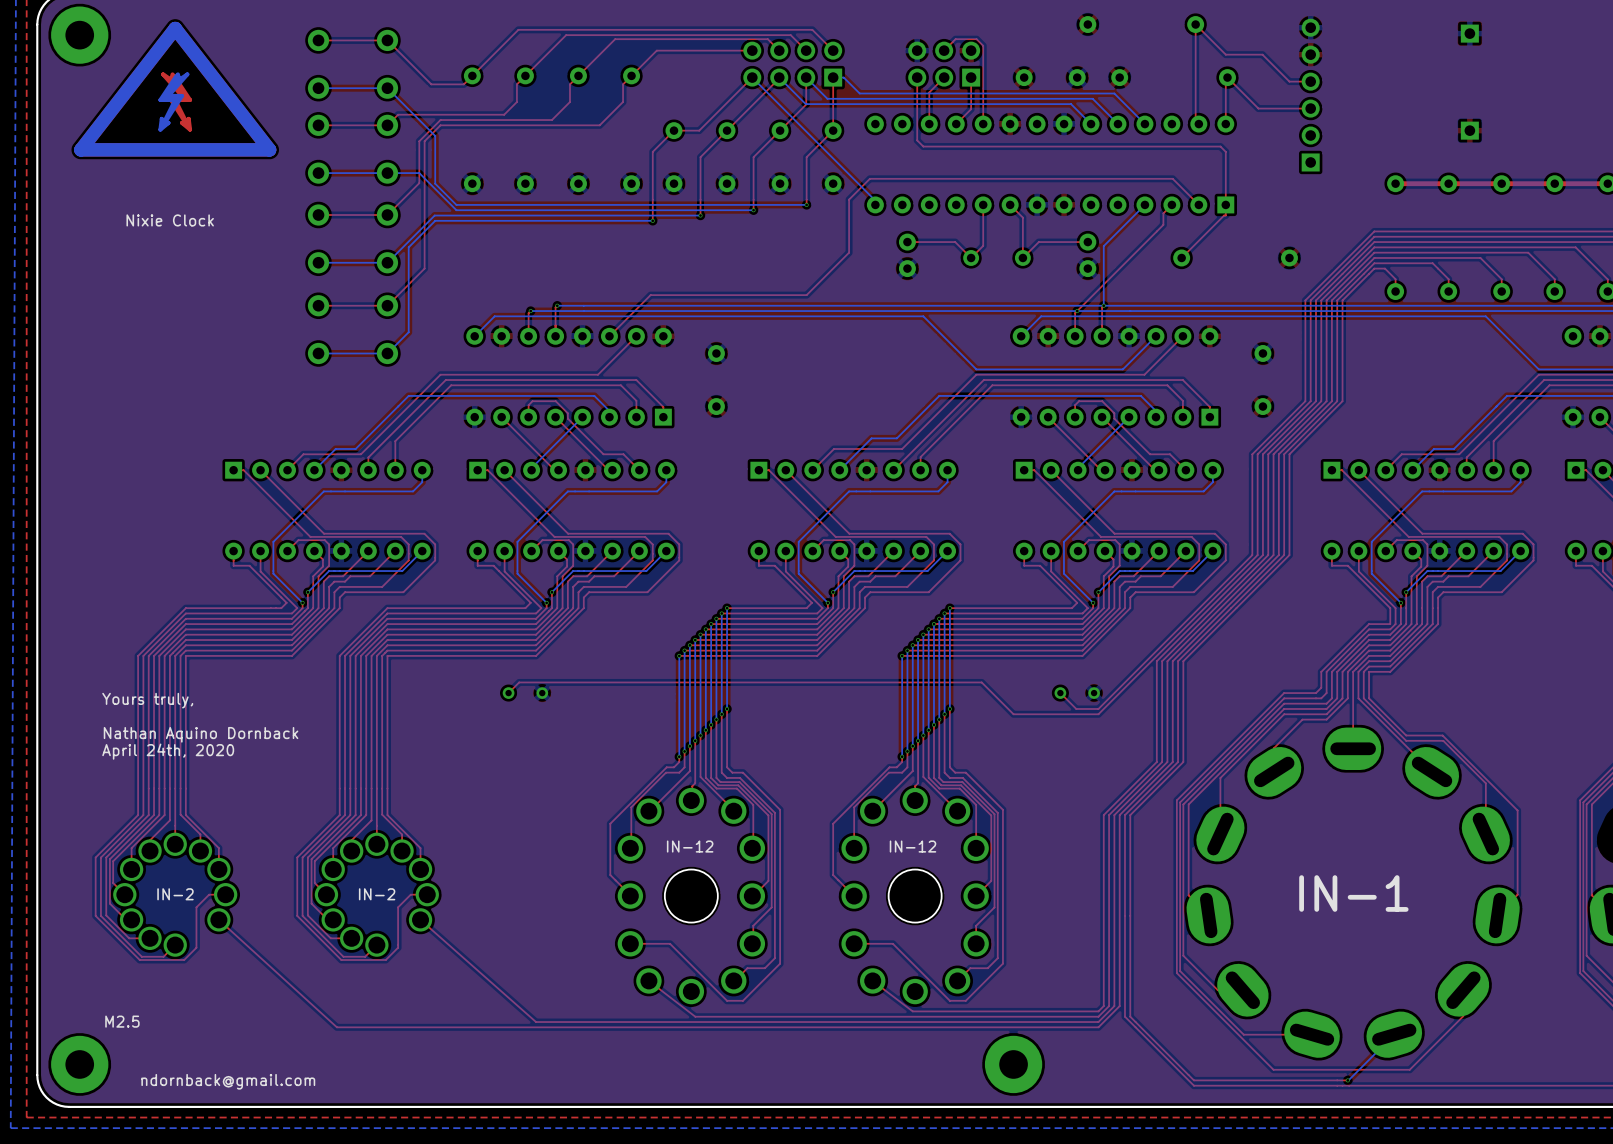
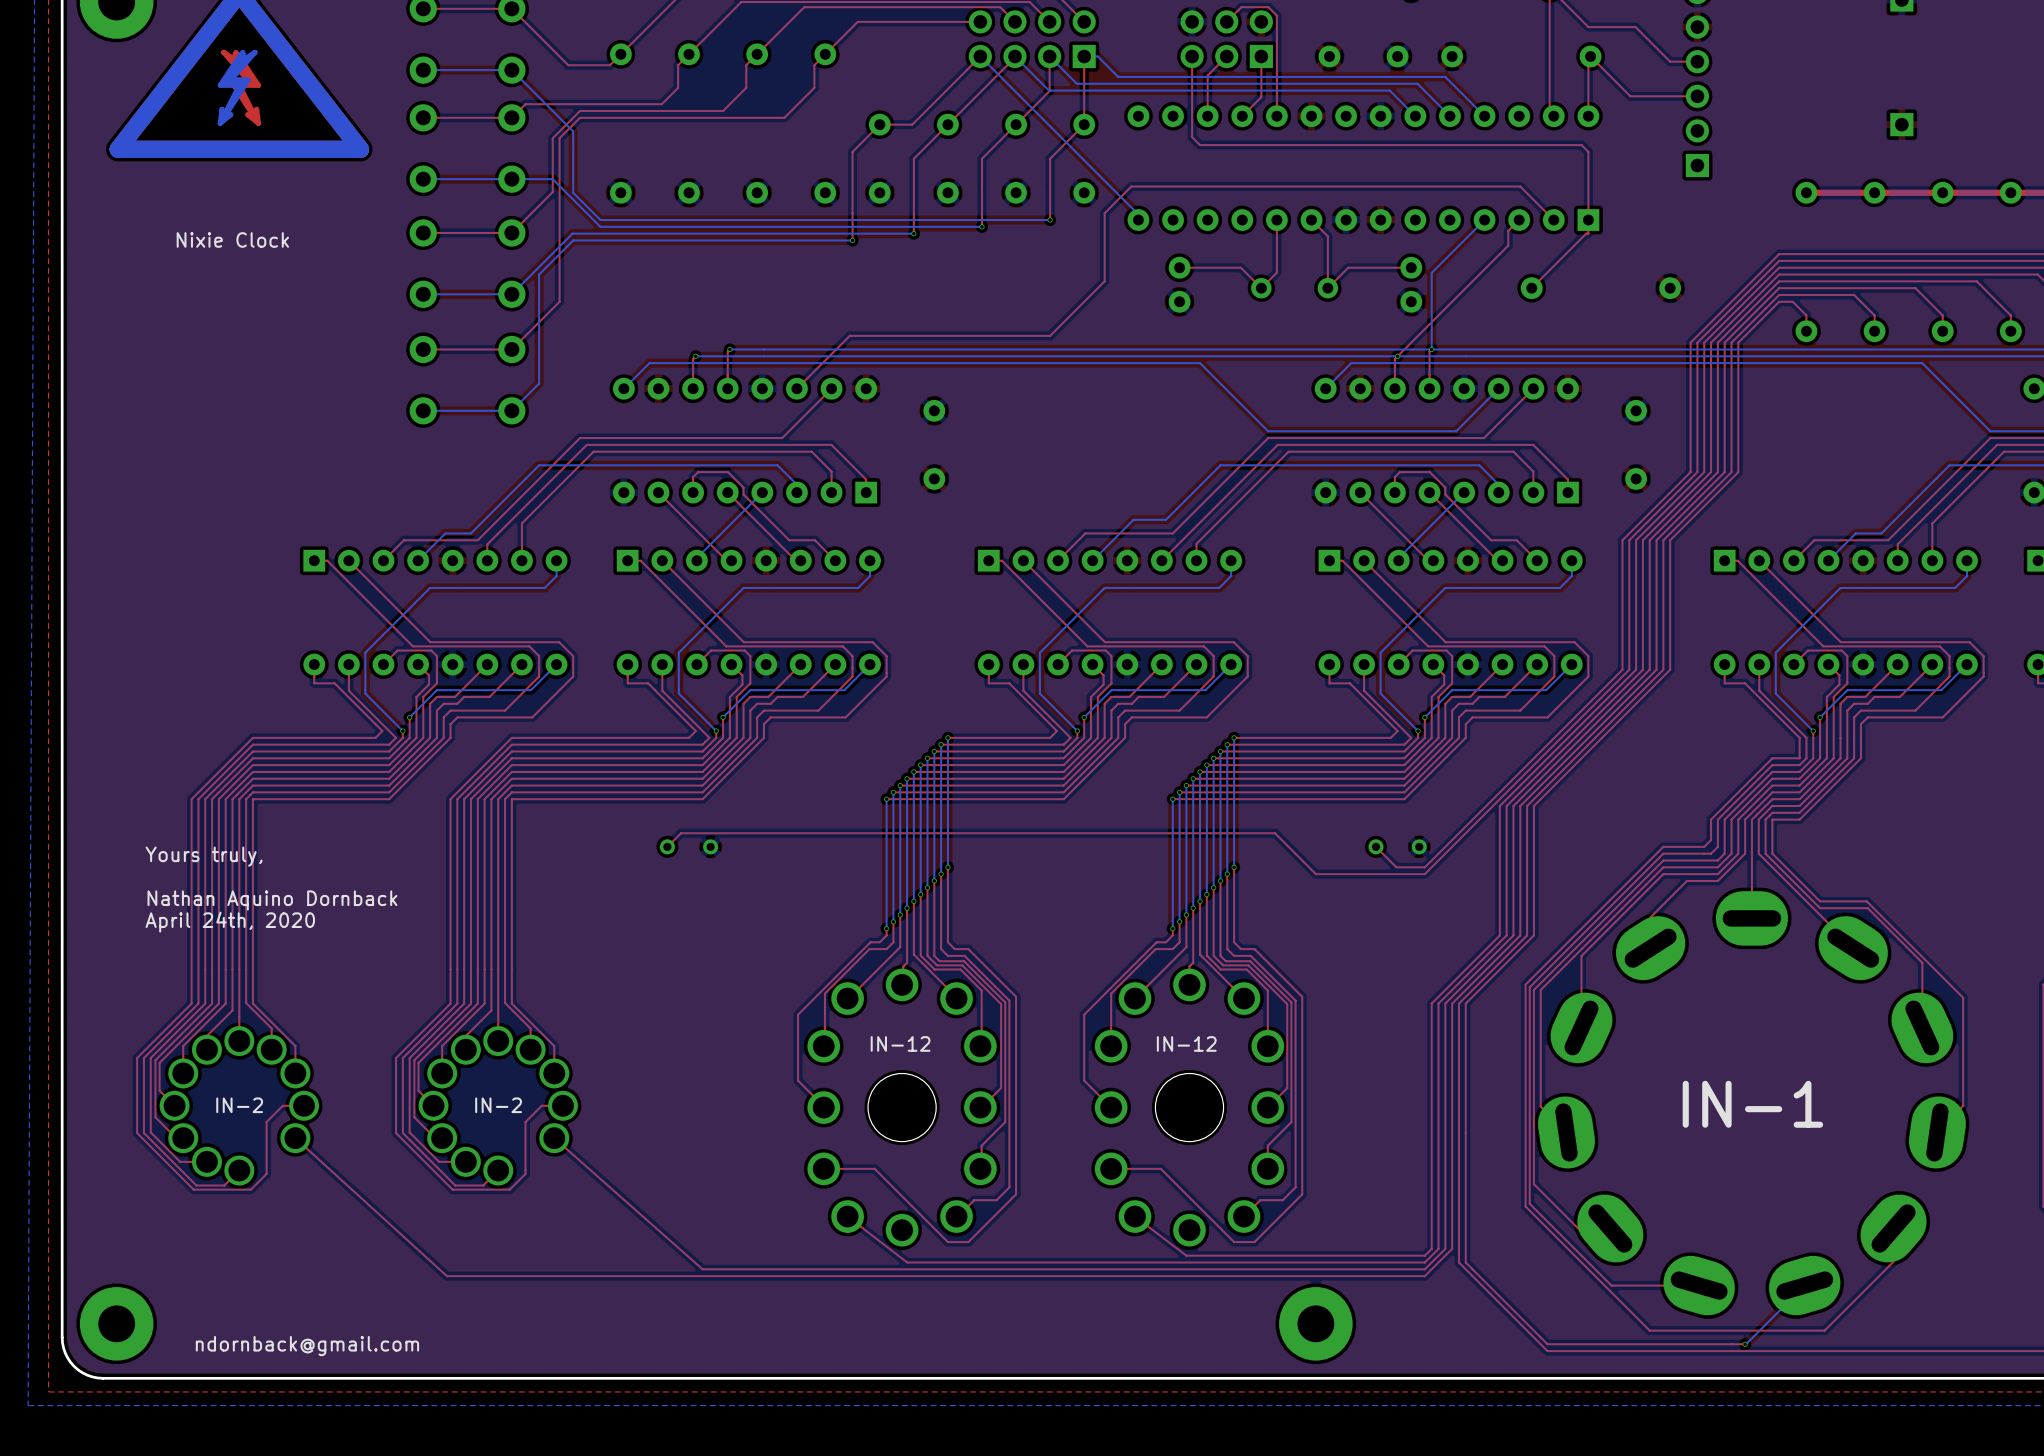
text: M2.5 (122, 1021) -> none

